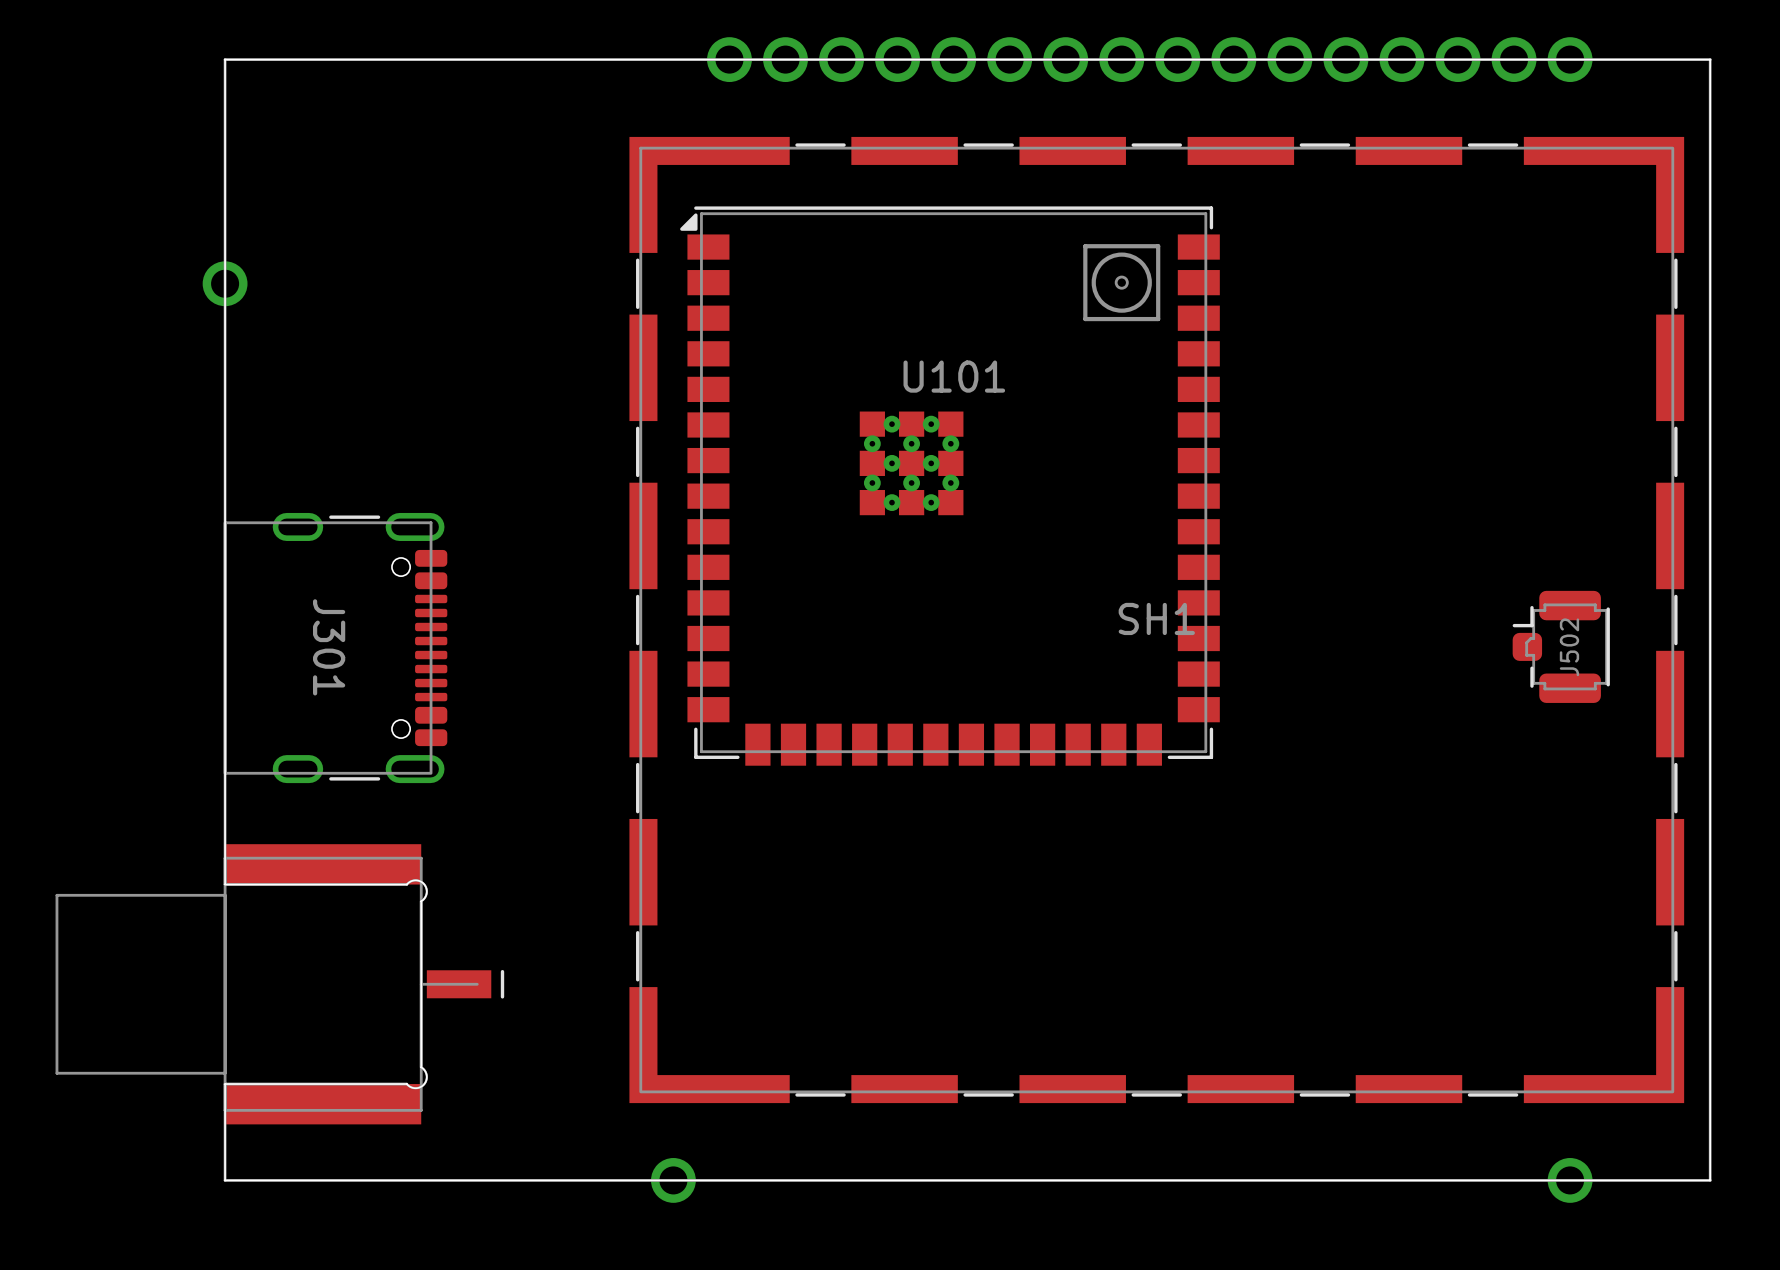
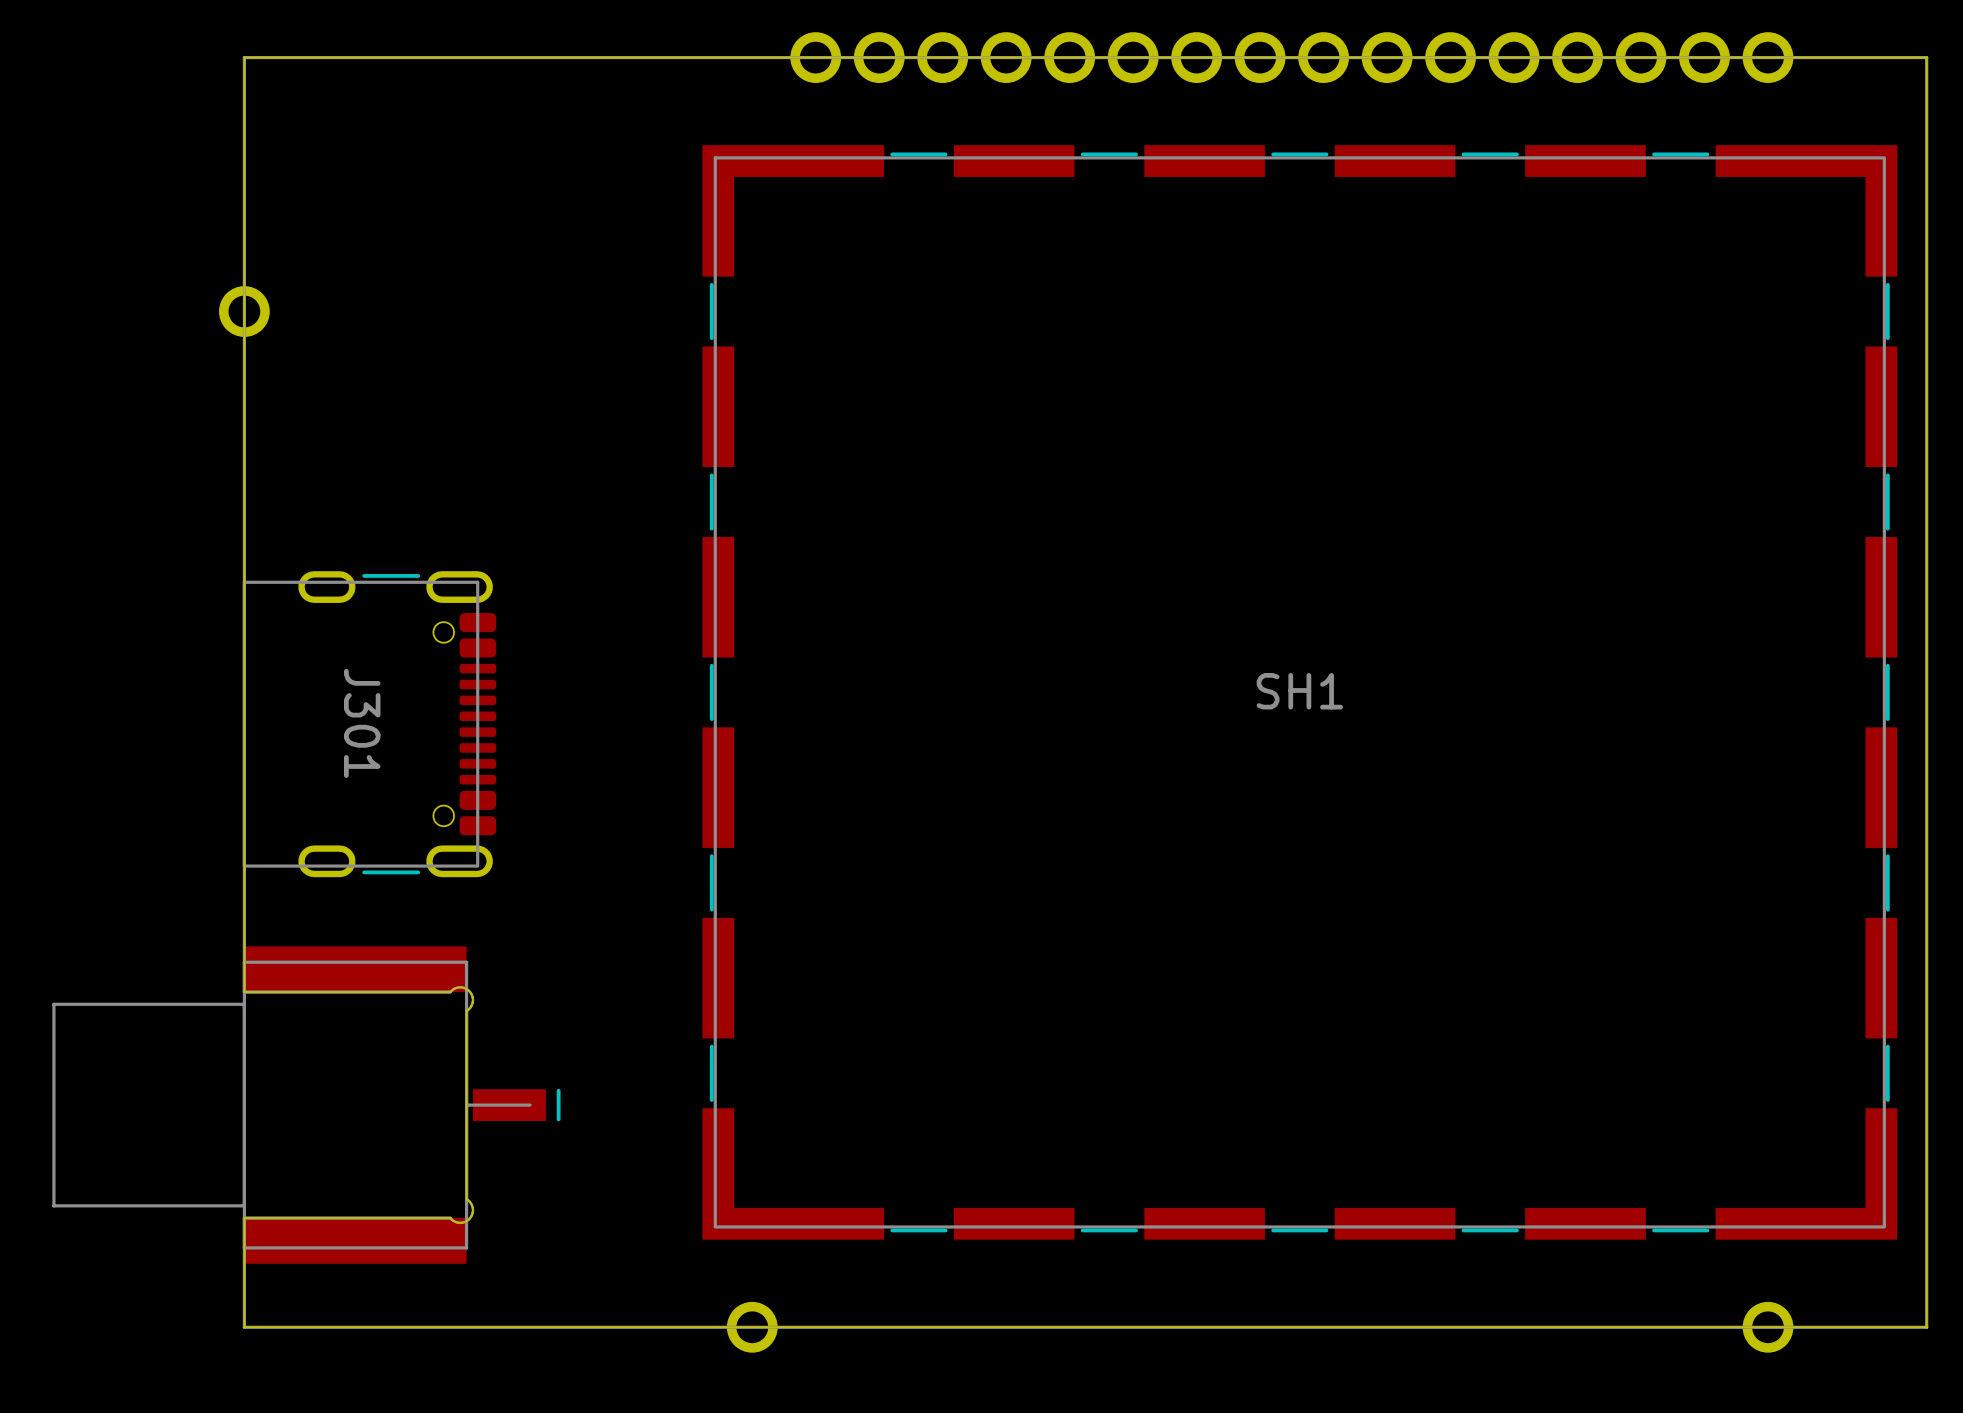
U101: (949, 486) -> none
J502: (1561, 646) -> none

